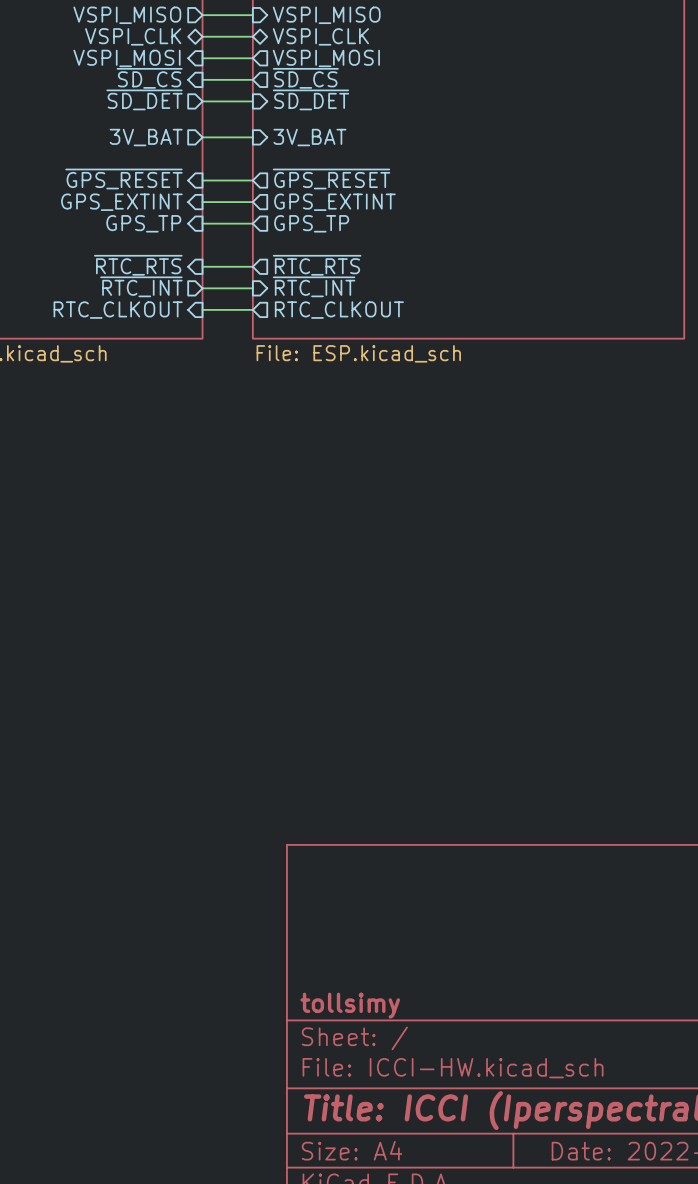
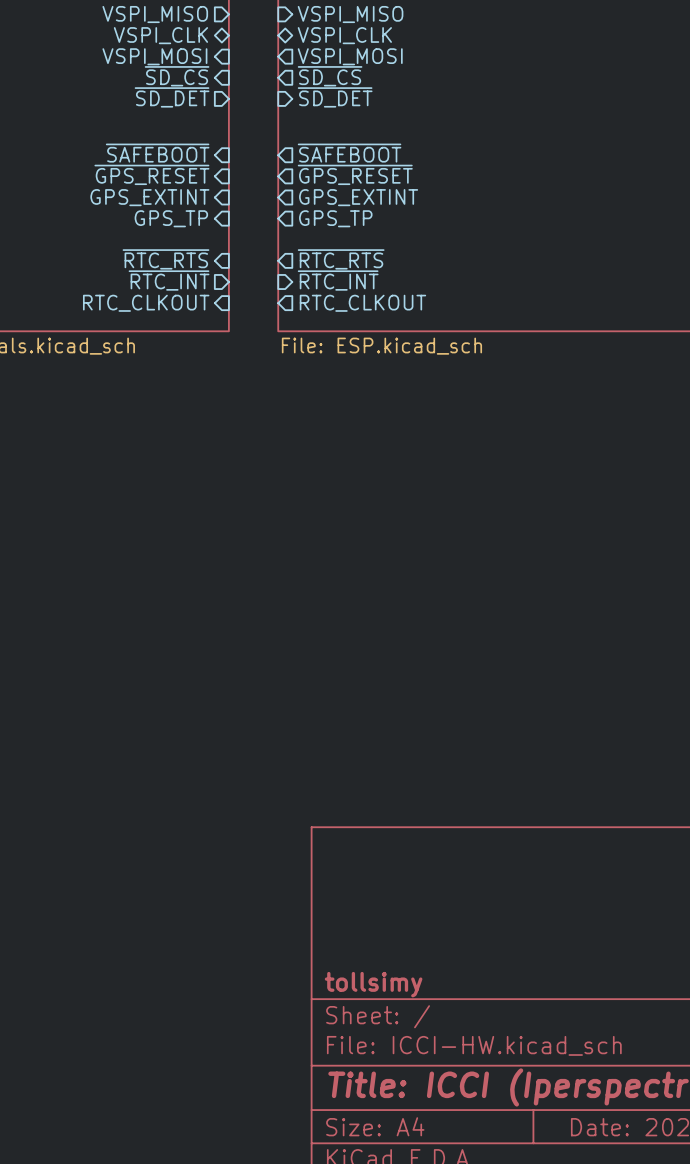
wire: (202, 15) (252, 15) -> none
wire: (202, 36) (252, 36) -> none
wire: (202, 58) (252, 58) -> none
wire: (202, 79) (252, 79) -> none
wire: (202, 101) (252, 101) -> none
sheet pin: 3V_BAT (146, 137) -> none
wire: (202, 137) (252, 137) -> none
sheet pin: 3V_BAT (309, 137) -> none
sheet pin: none -> ~{SAFEBOOT} (157, 153)
sheet pin: none -> ~{SAFEBOOT} (349, 153)
wire: (202, 180) (252, 180) -> none
wire: (202, 202) (252, 202) -> none
wire: (202, 223) (252, 223) -> none
wire: (202, 266) (252, 266) -> none
wire: (202, 288) (252, 288) -> none
wire: (202, 309) (252, 309) -> none

